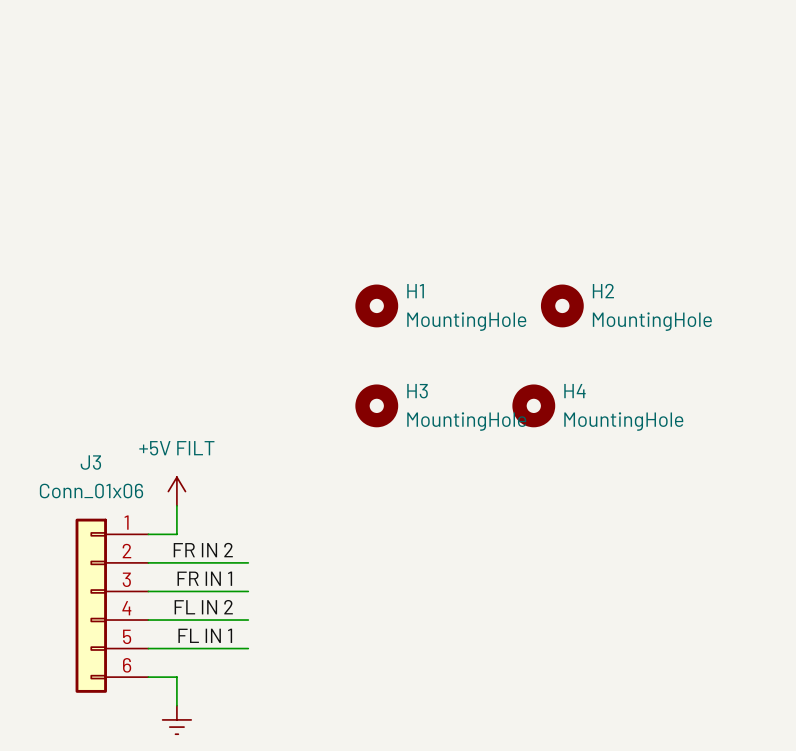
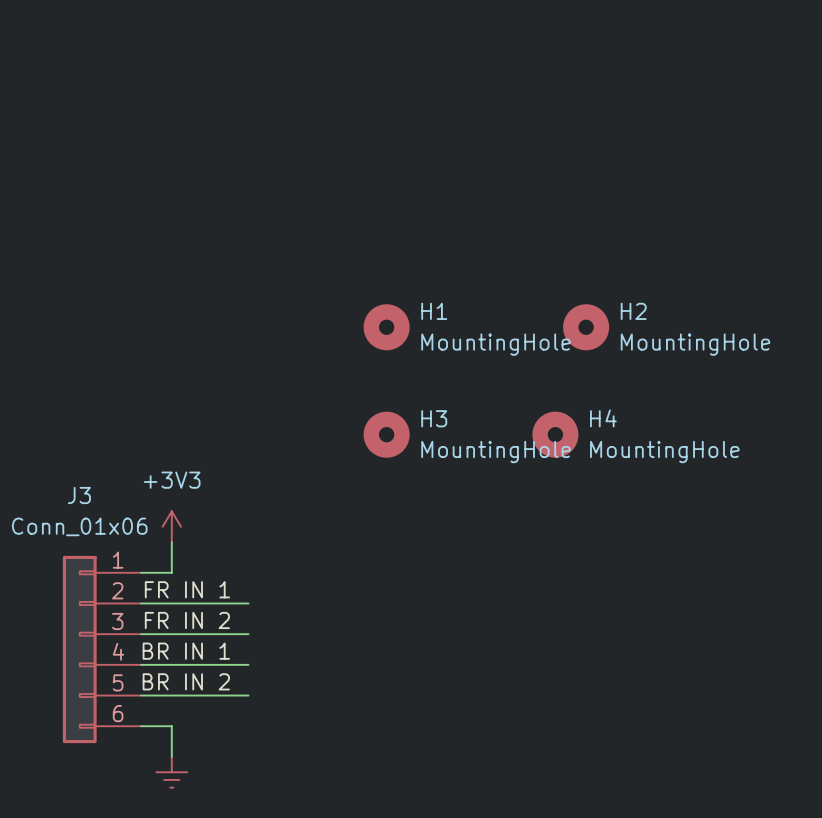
power symbol: +5V FILT (176, 491) -> +3V3 (171, 526)
label: FR IN 2 (203, 550) -> FR IN 1 (187, 589)
label: FR IN 1 (204, 578) -> FR IN 2 (187, 620)
label: FL IN 2 (203, 607) -> BR IN 1 (186, 651)
label: FL IN 1 (205, 635) -> BR IN 2 (186, 681)

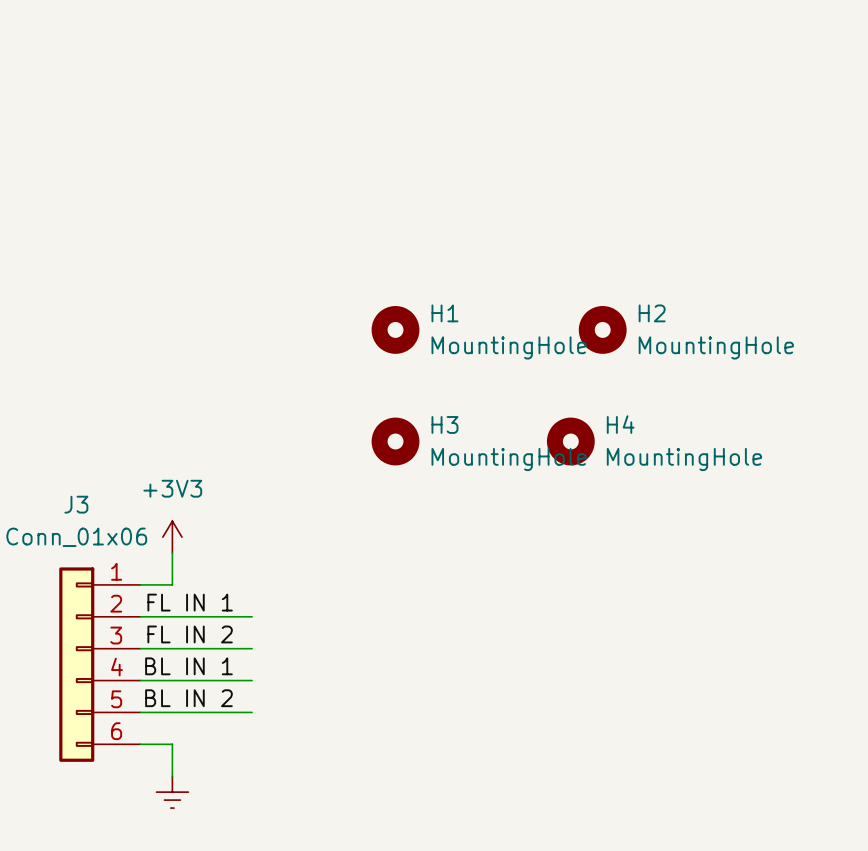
label: FR IN 1 (187, 589) -> FL IN 1 (190, 602)
label: FR IN 2 (187, 620) -> FL IN 2 (190, 634)
label: BR IN 1 (186, 651) -> BL IN 1 (188, 666)
label: BR IN 2 (186, 681) -> BL IN 2 (188, 698)

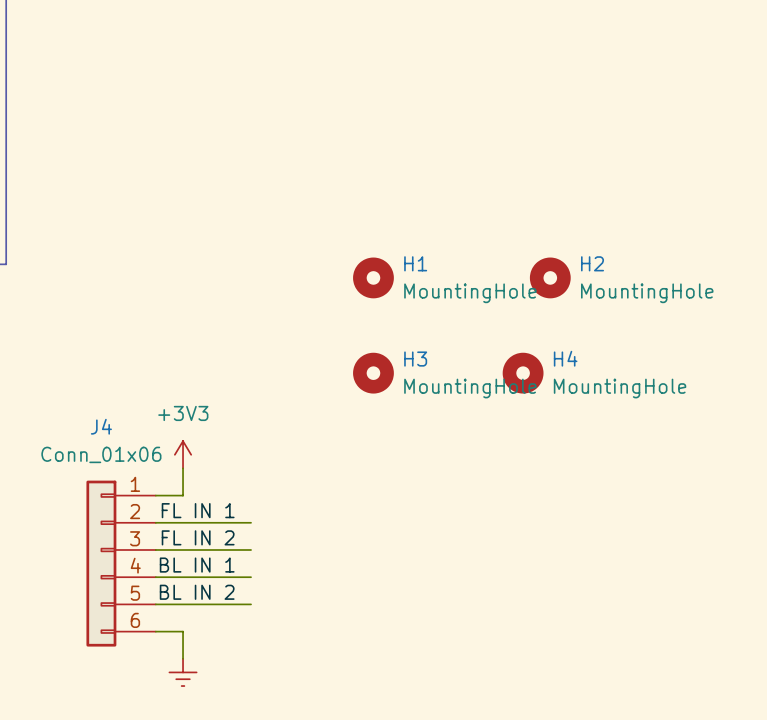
J3 name: J3 (76, 504) -> J4 (101, 426)

